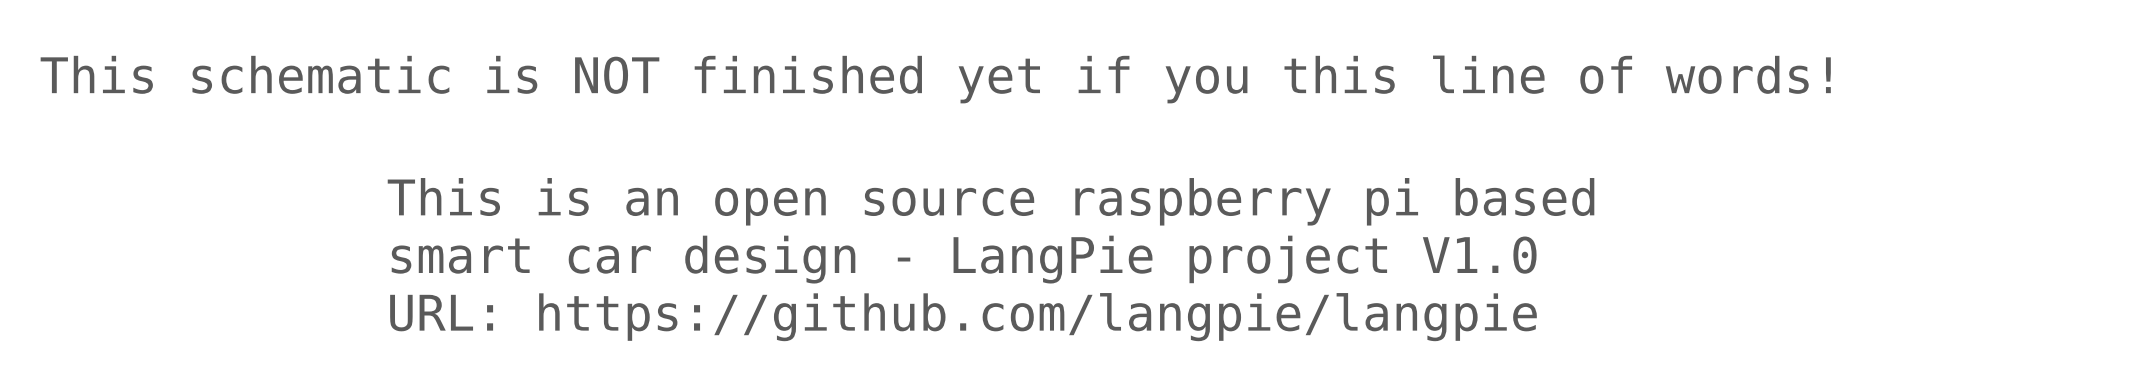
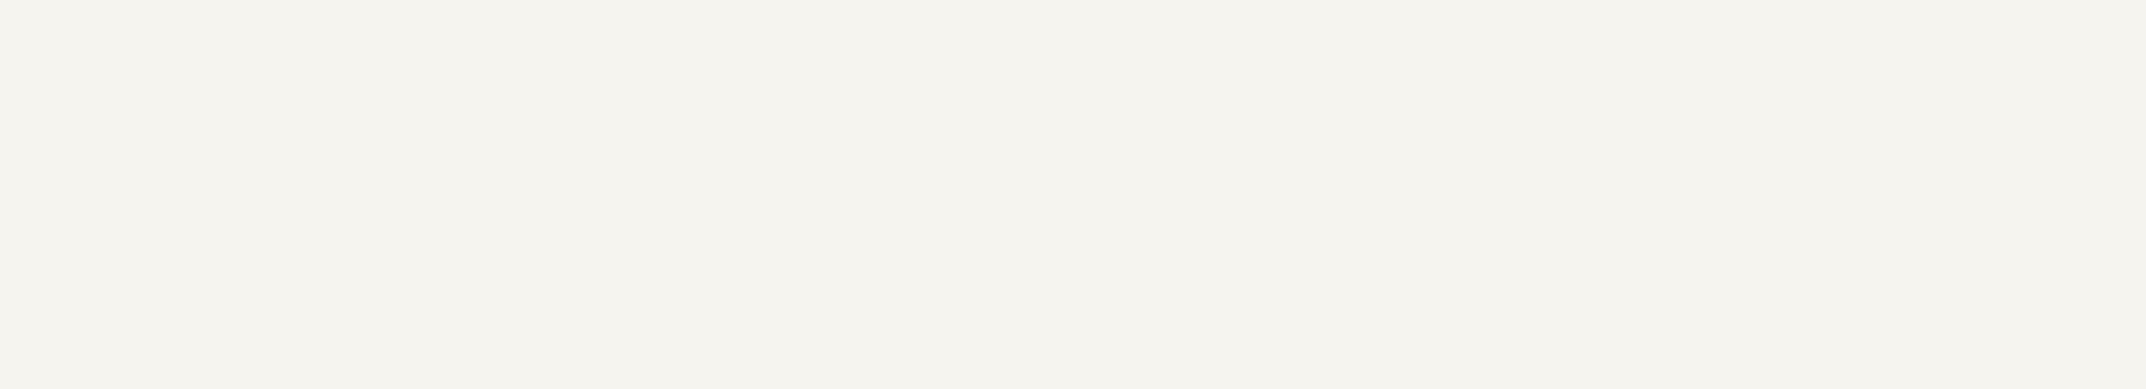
text: This schematic is NOT finished yet if you this line of words! (935, 79) -> none
text: This is an open source raspberry pi based (991, 201) -> none
text: smart car design - LangPie project V1.0 (964, 259) -> none
text: URL: https://github.com/langpie/langpie (963, 317) -> none

